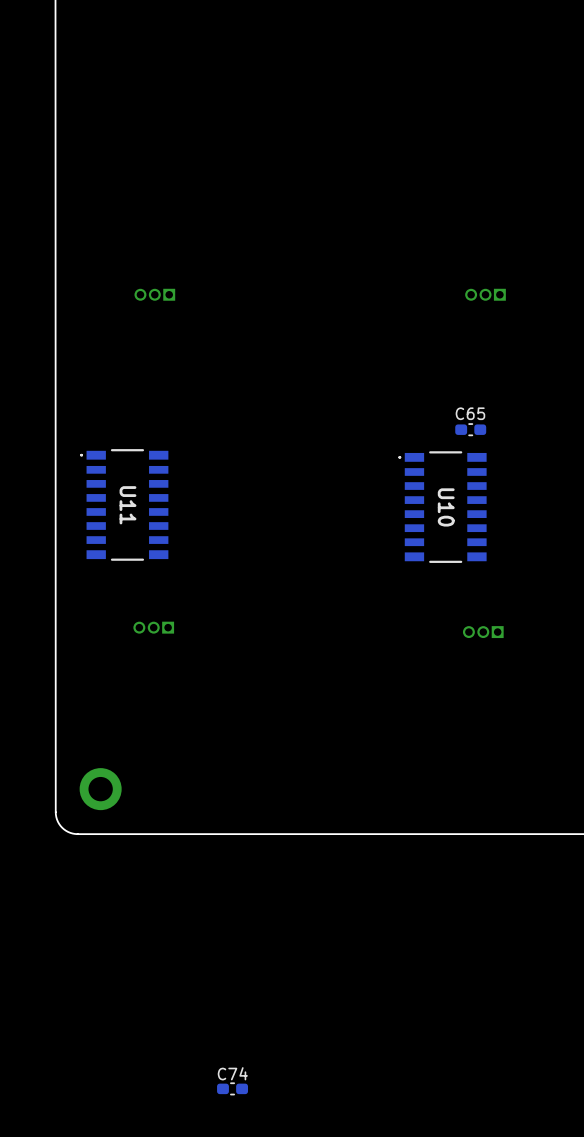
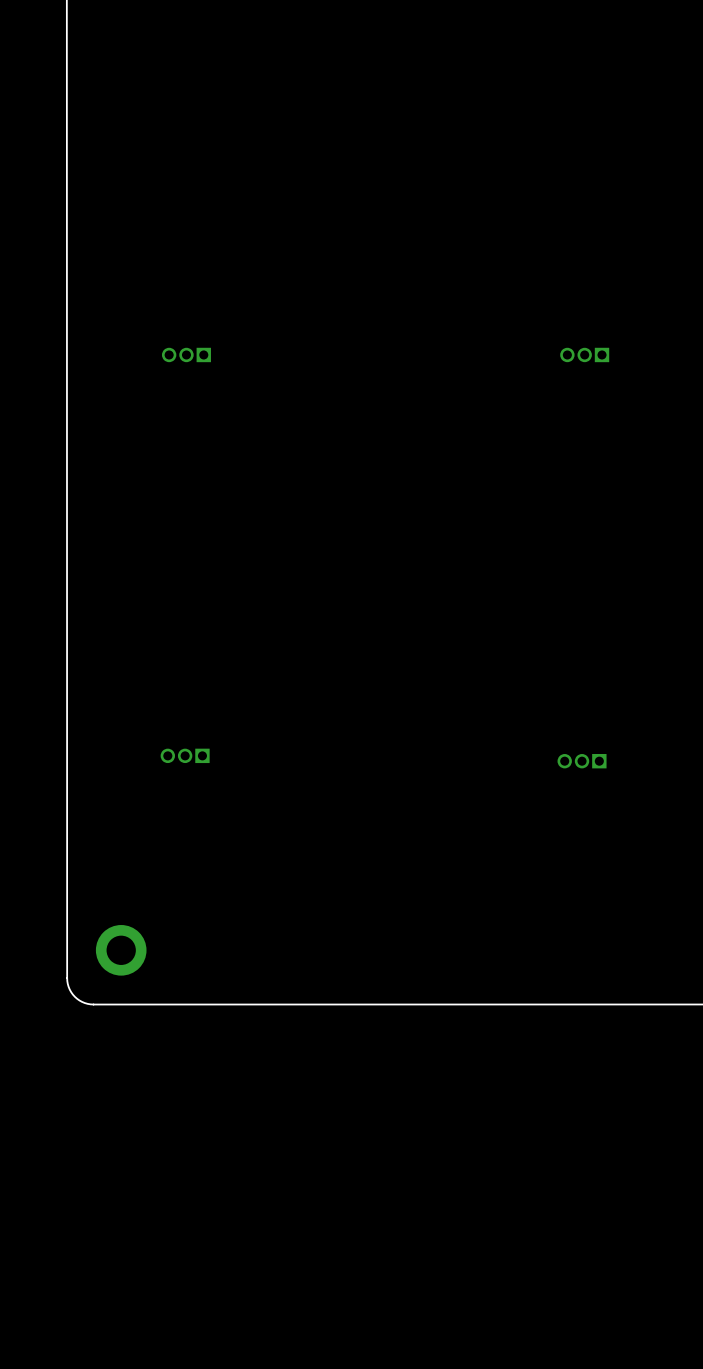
C65: (470, 429) -> none
U11: (124, 504) -> none
U10: (442, 507) -> none
C74: (232, 1088) -> none

